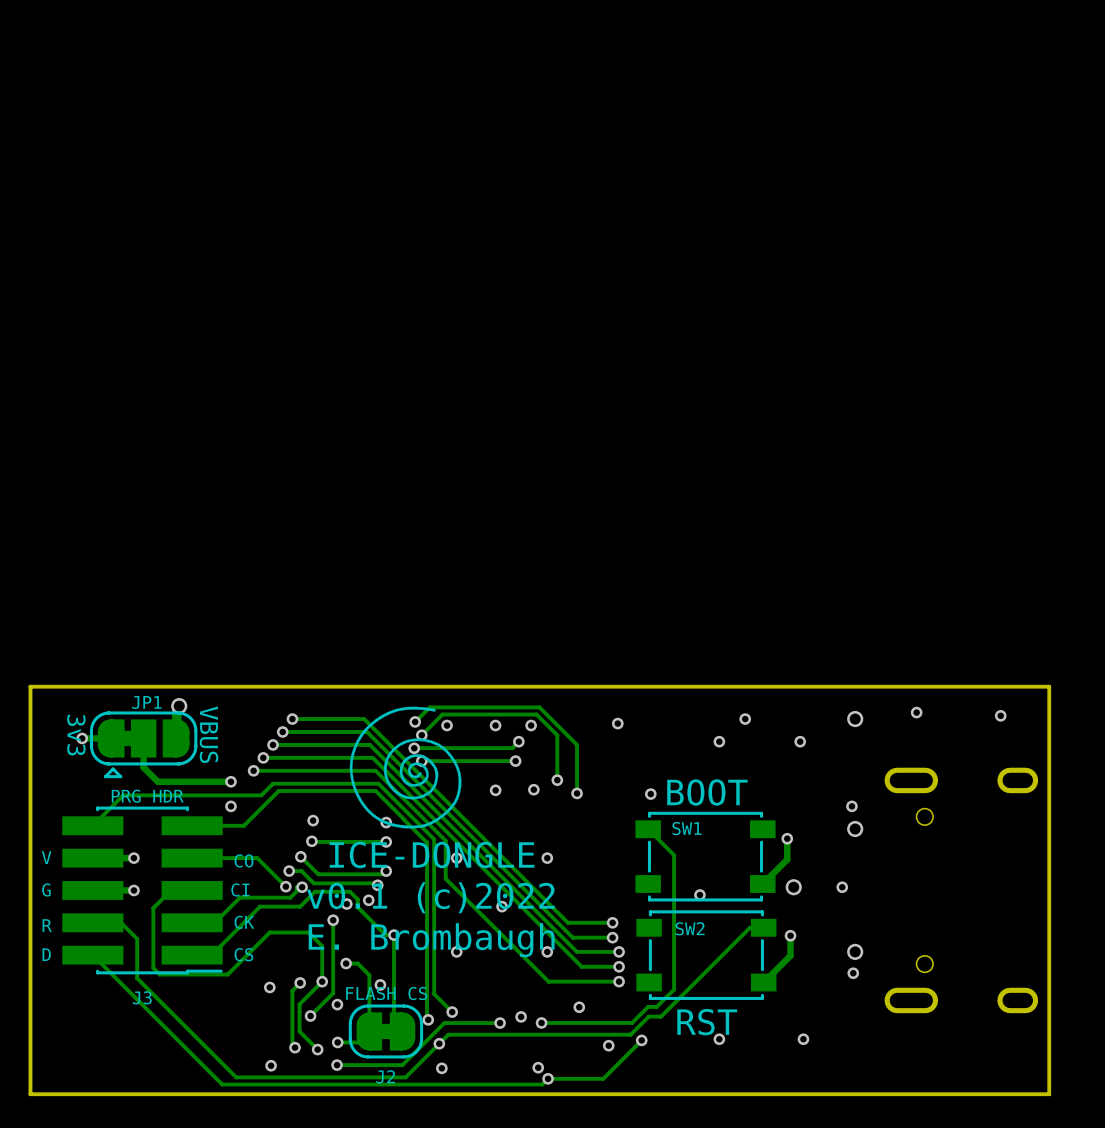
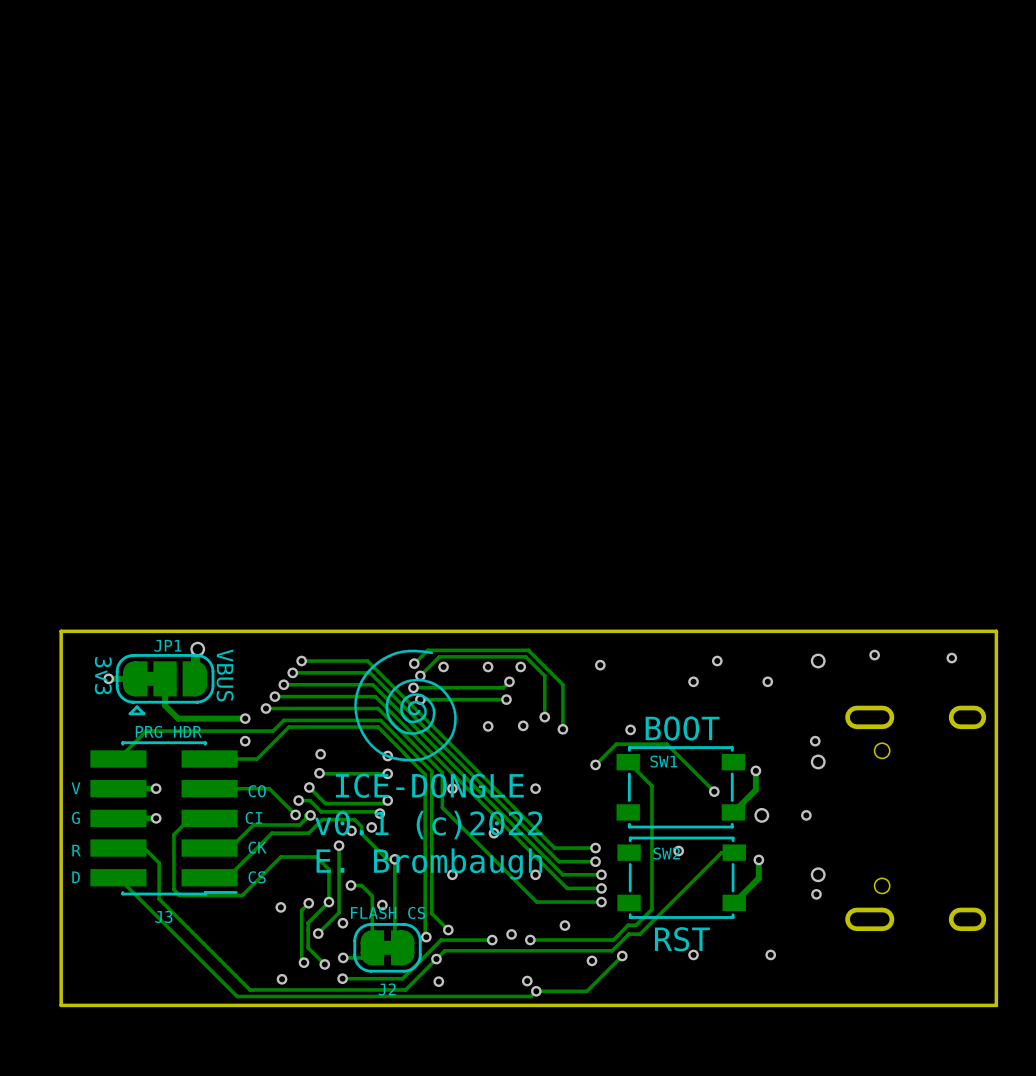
track: none -> (595, 764) (616, 744) (666, 744) (714, 791)
via: none -> (595, 764)
via: none -> (714, 791)
via: (699, 894) -> none
via: none -> (678, 851)

